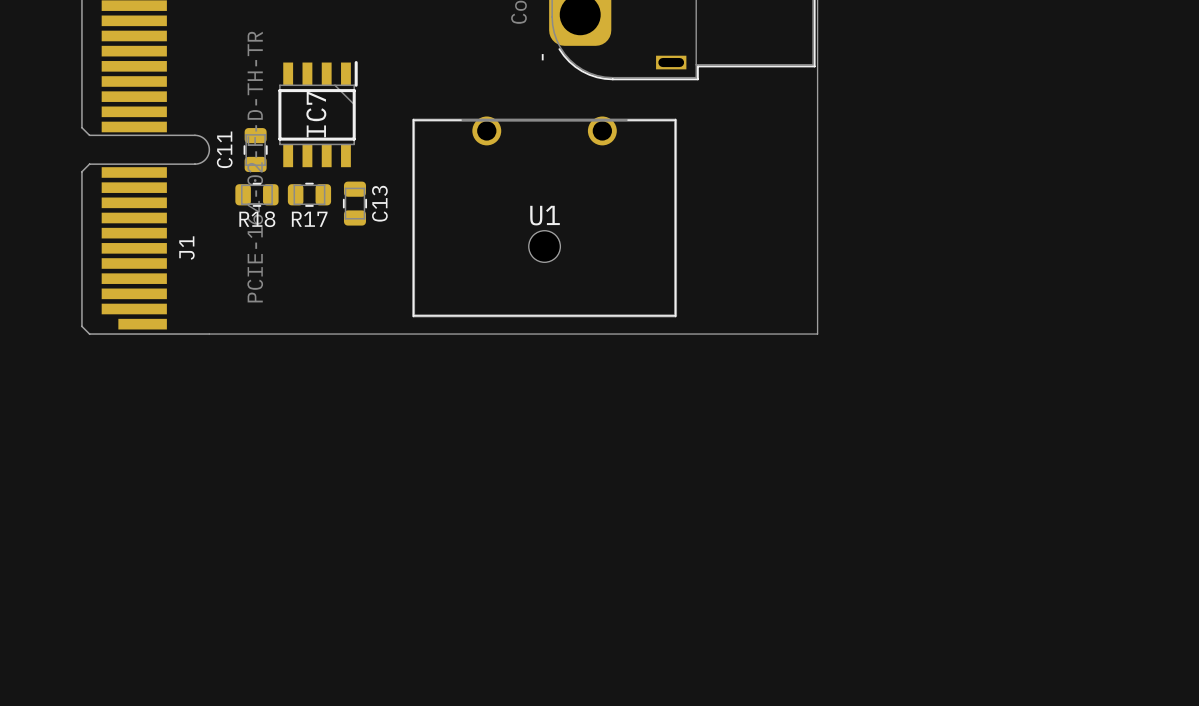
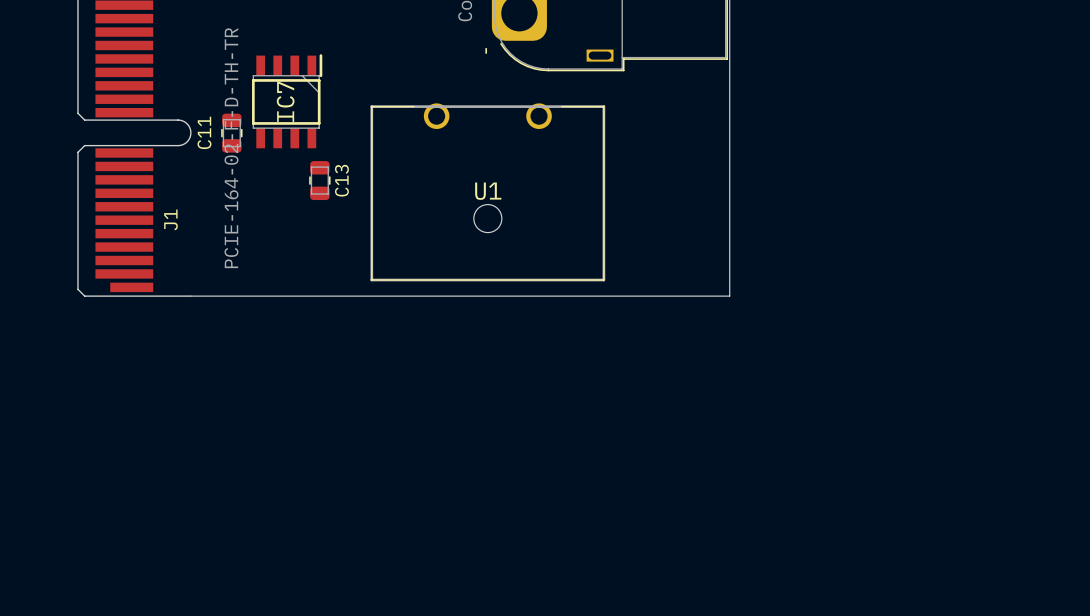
R18: (256, 194) -> none
R17: (309, 194) -> none

